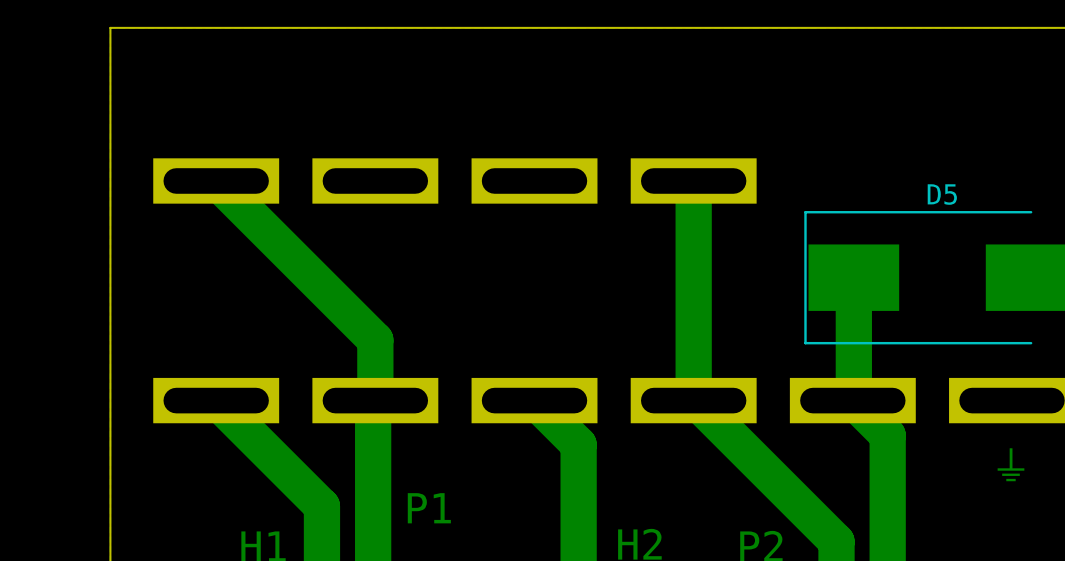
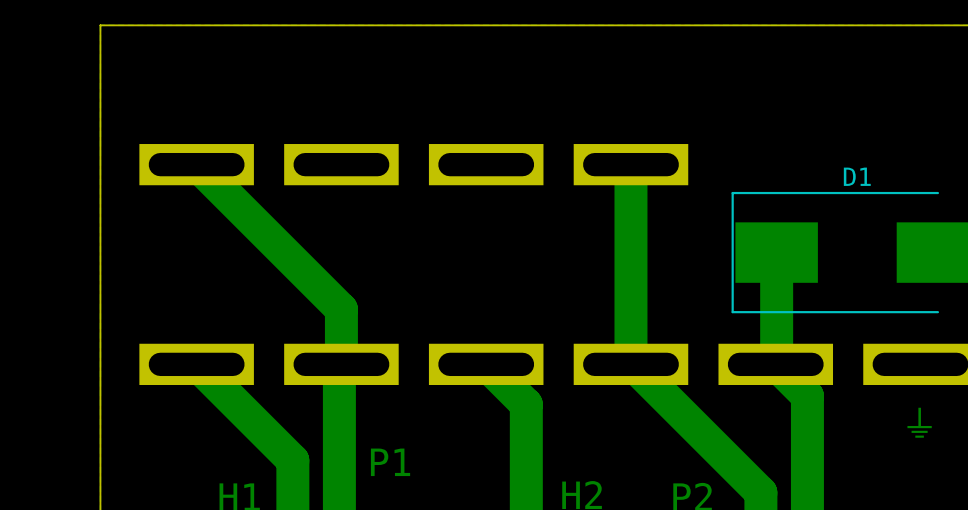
D5 name: D5 (942, 194) -> D1 (857, 176)

